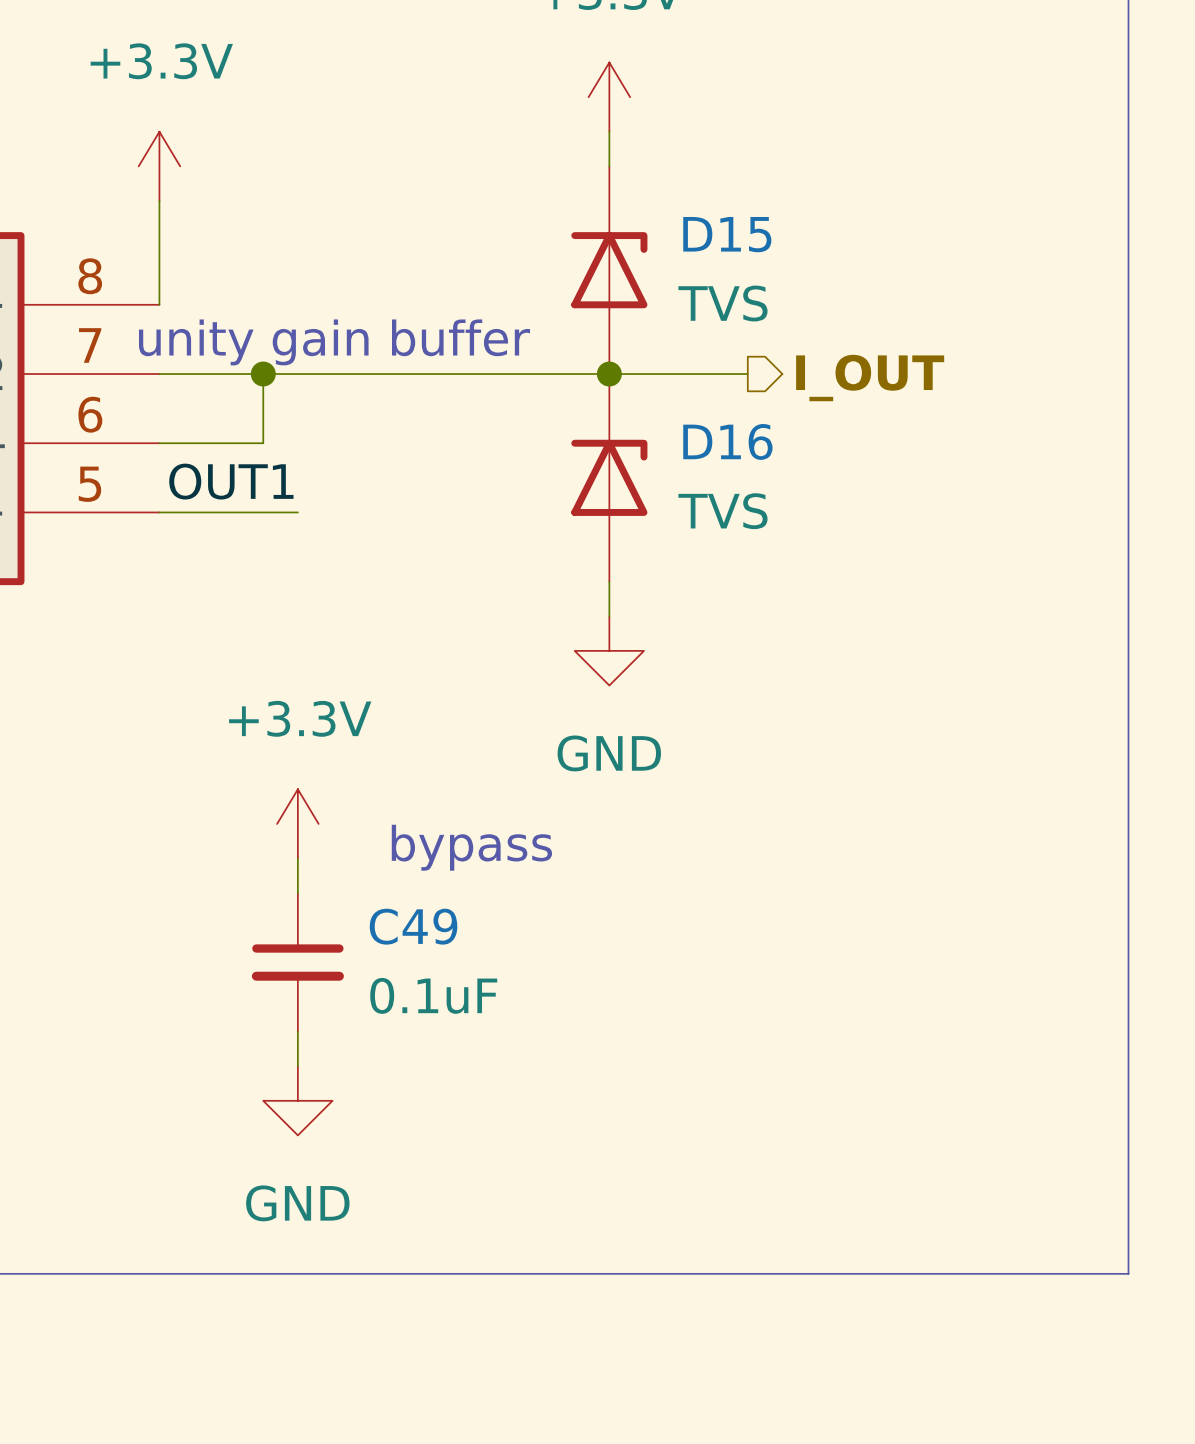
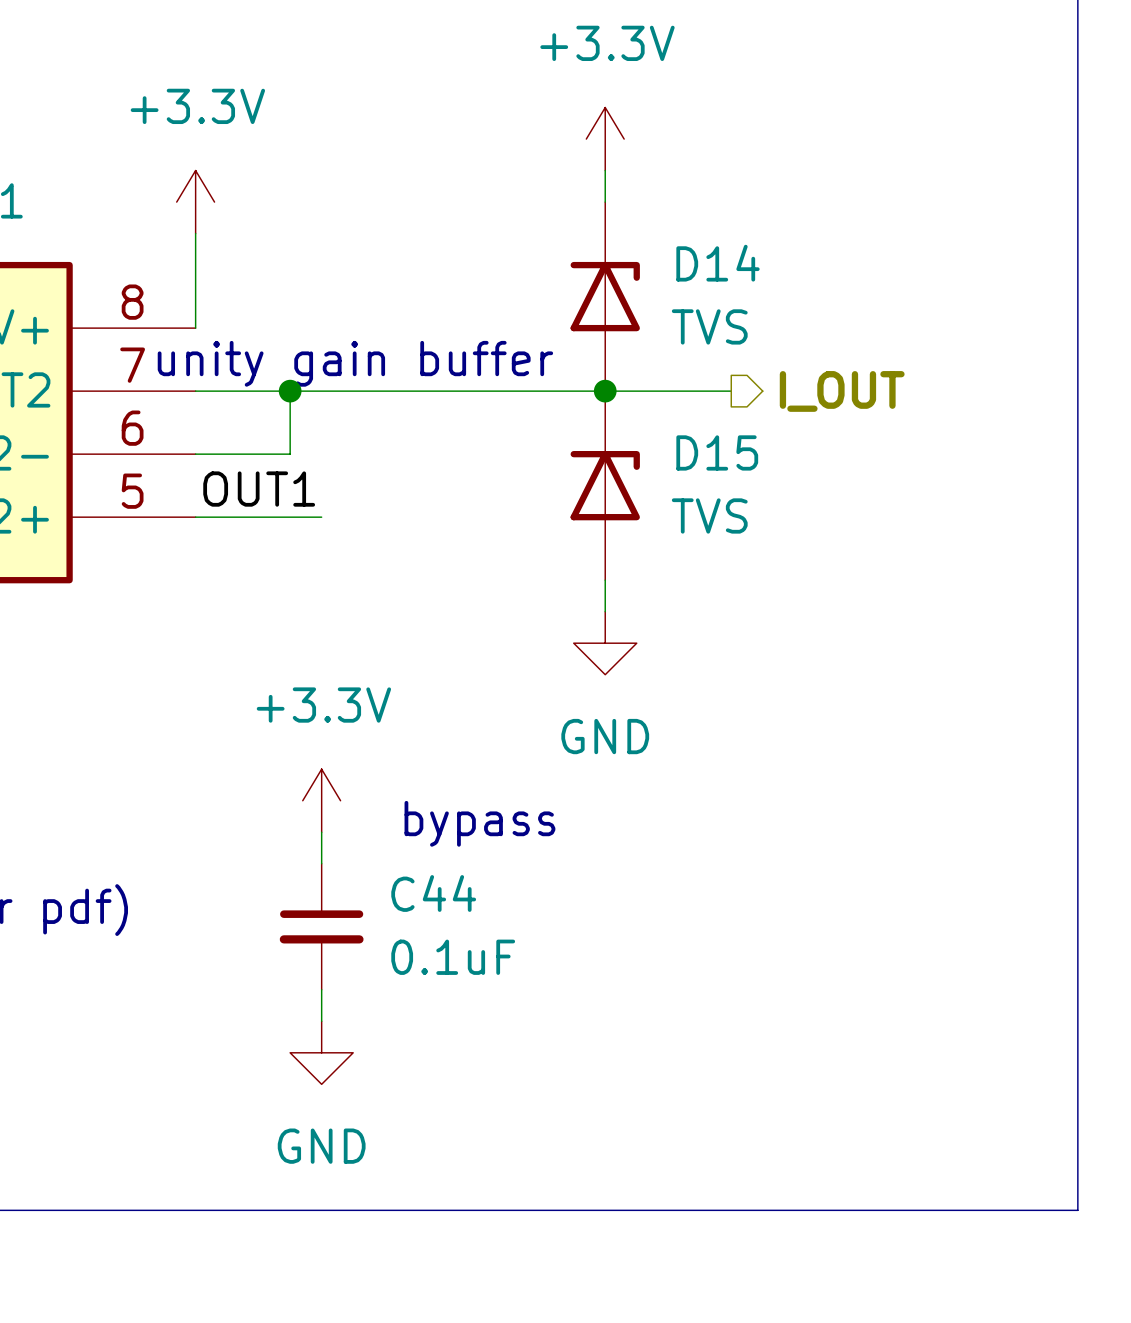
D15 name: D15 (727, 234) -> D14 (718, 263)
D16 name: D16 (727, 441) -> D15 (717, 452)
C49 name: C49 (413, 926) -> C44 (433, 893)

